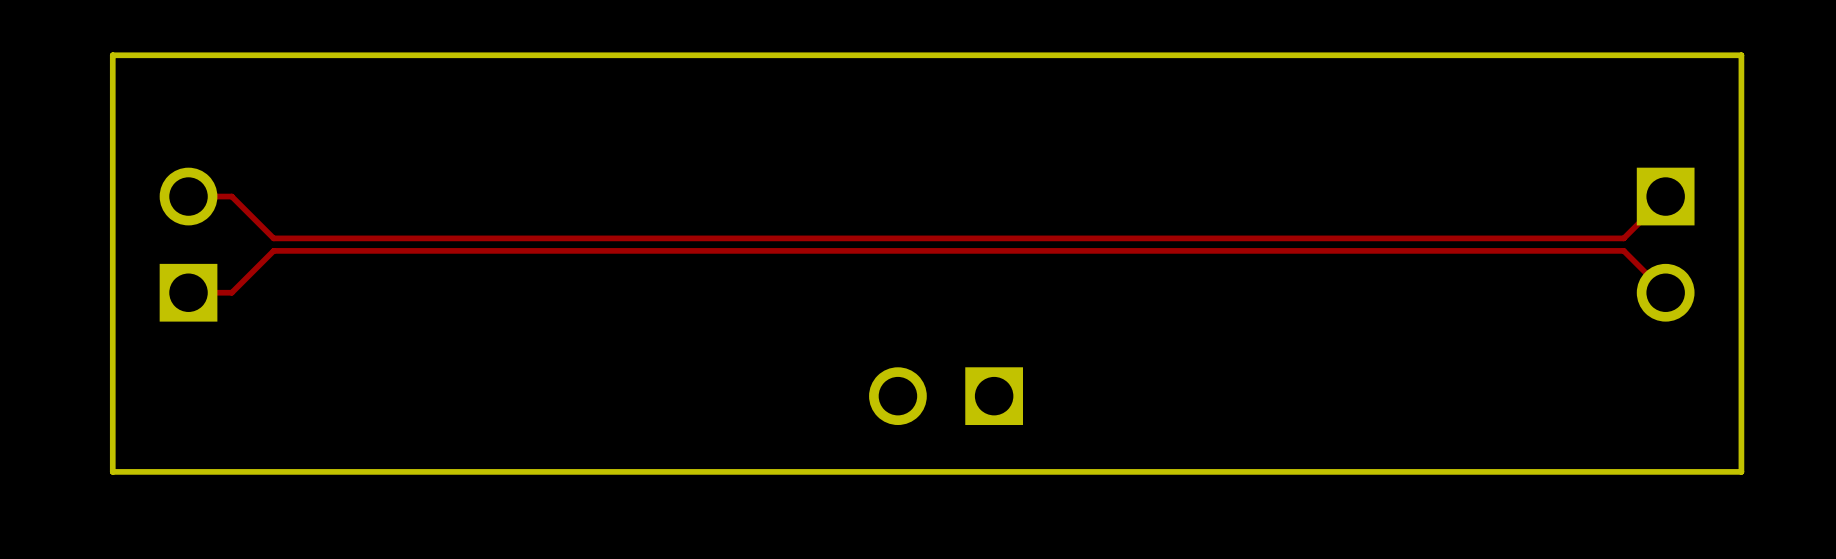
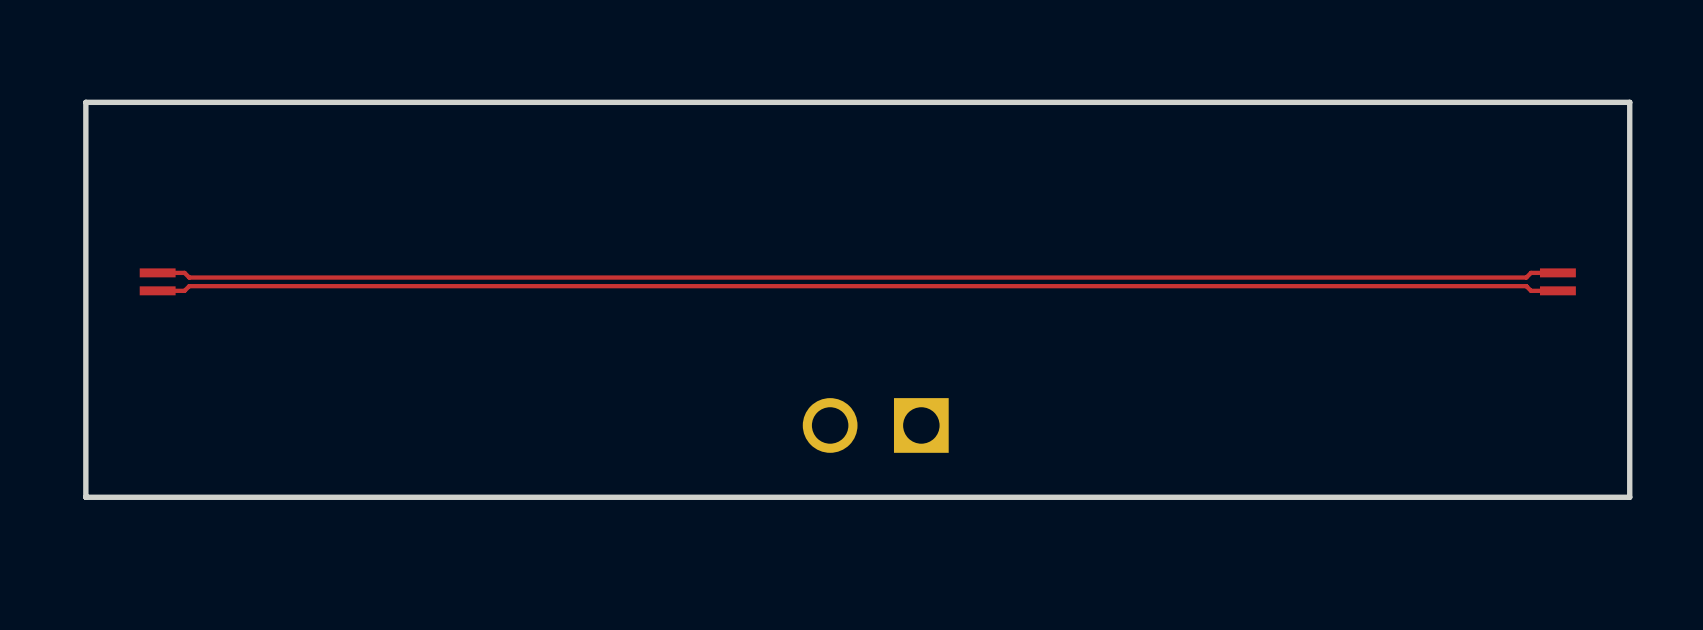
part footprint: [159, 167, 218, 322] -> [139, 268, 176, 296]
part footprint: [1636, 167, 1695, 322] -> [1539, 268, 1576, 296]
top track: (1665, 196) (1623, 238) (273, 238) (231, 196) (188, 196) -> none
top track: none -> (1557, 272) (1531, 272) (1526, 277) (189, 277) (184, 272) (157, 272)
top track: none -> (1557, 290) (1531, 290) (1526, 286) (189, 286) (184, 290) (157, 290)
top track: (1665, 292) (1623, 250) (273, 250) (231, 292) (188, 292) -> none

